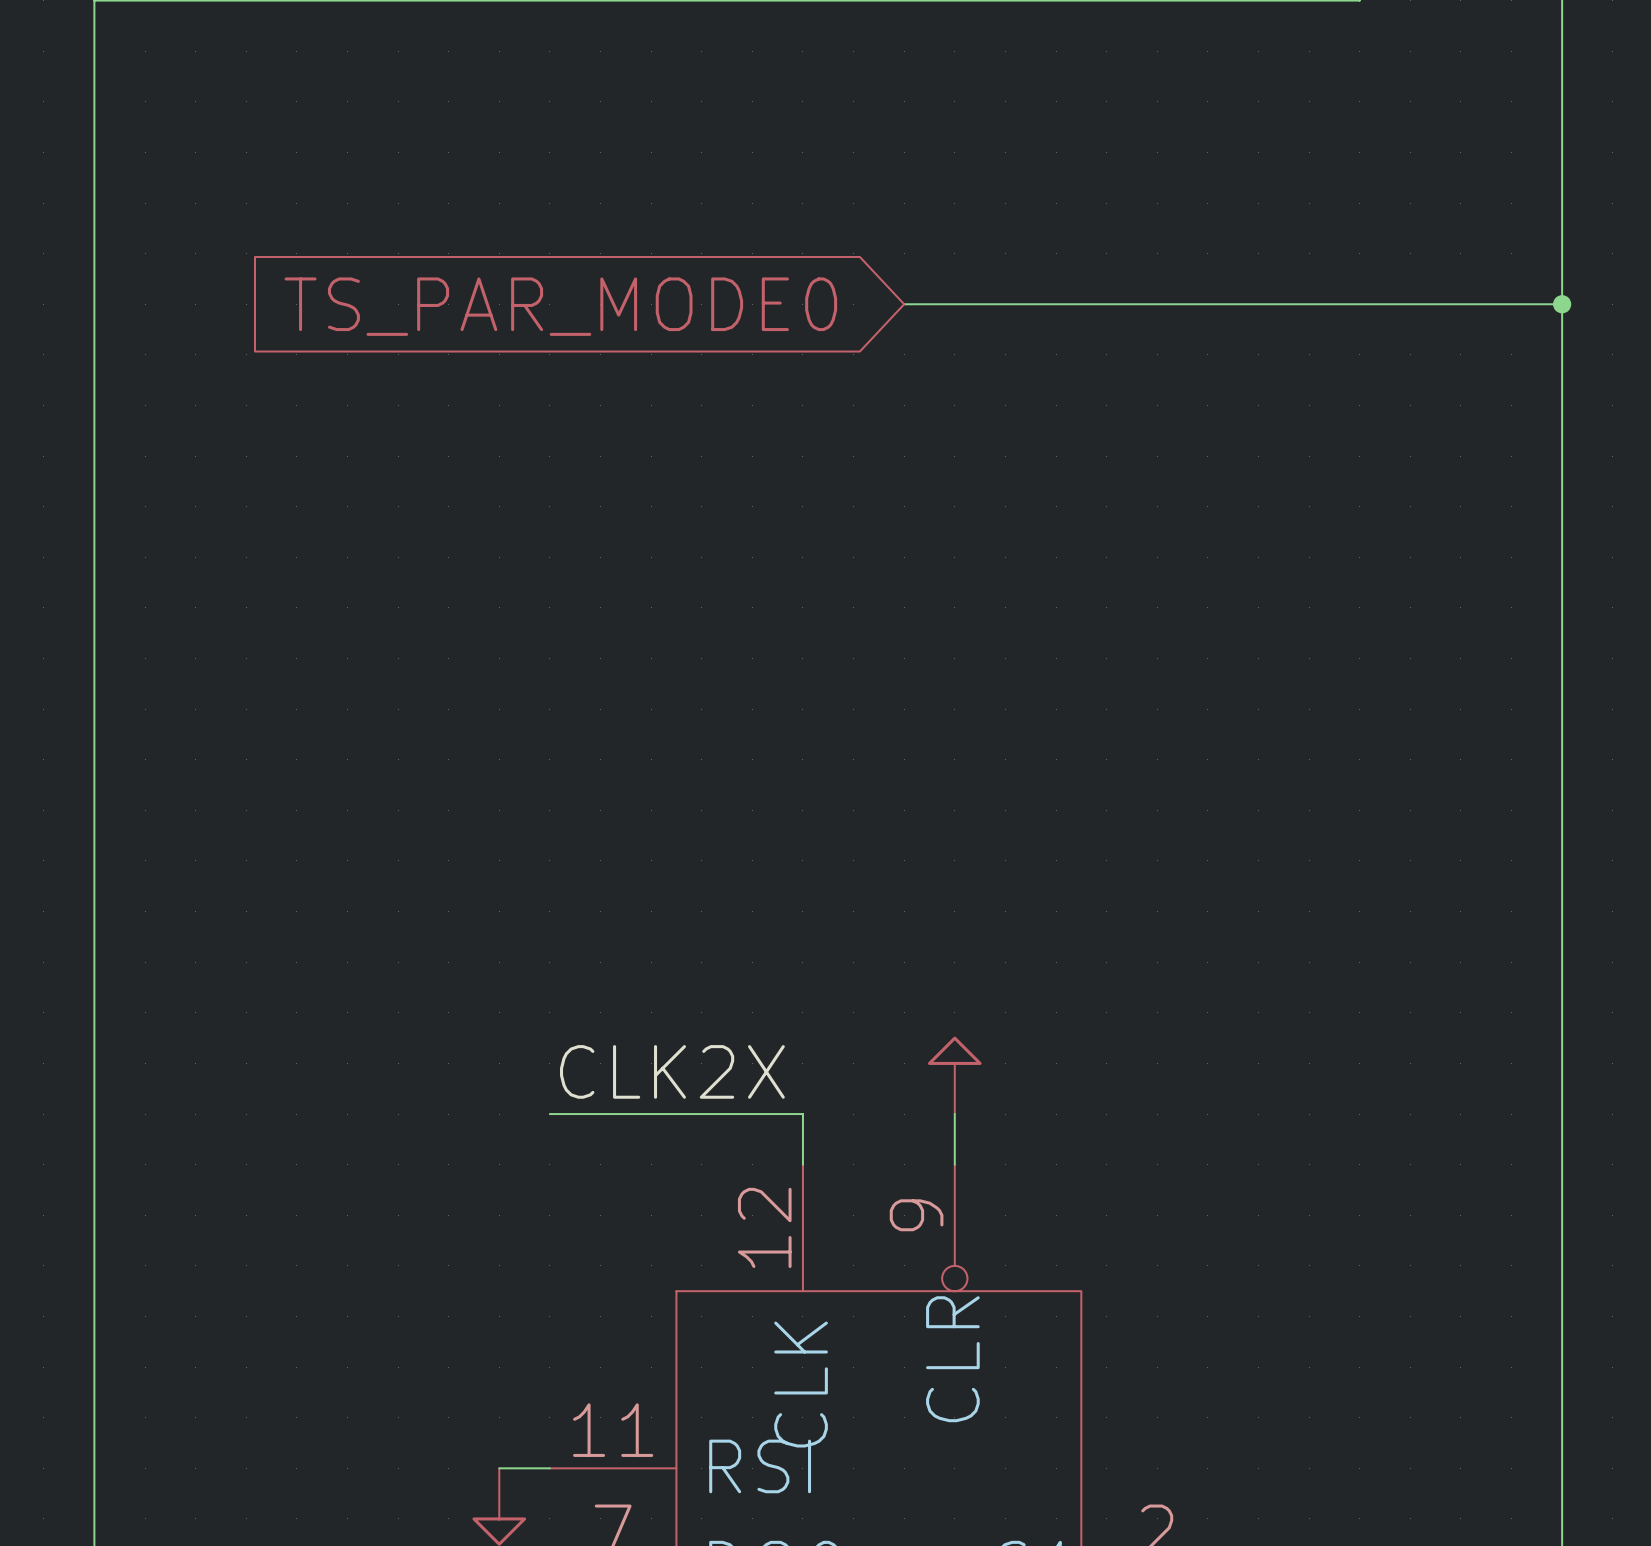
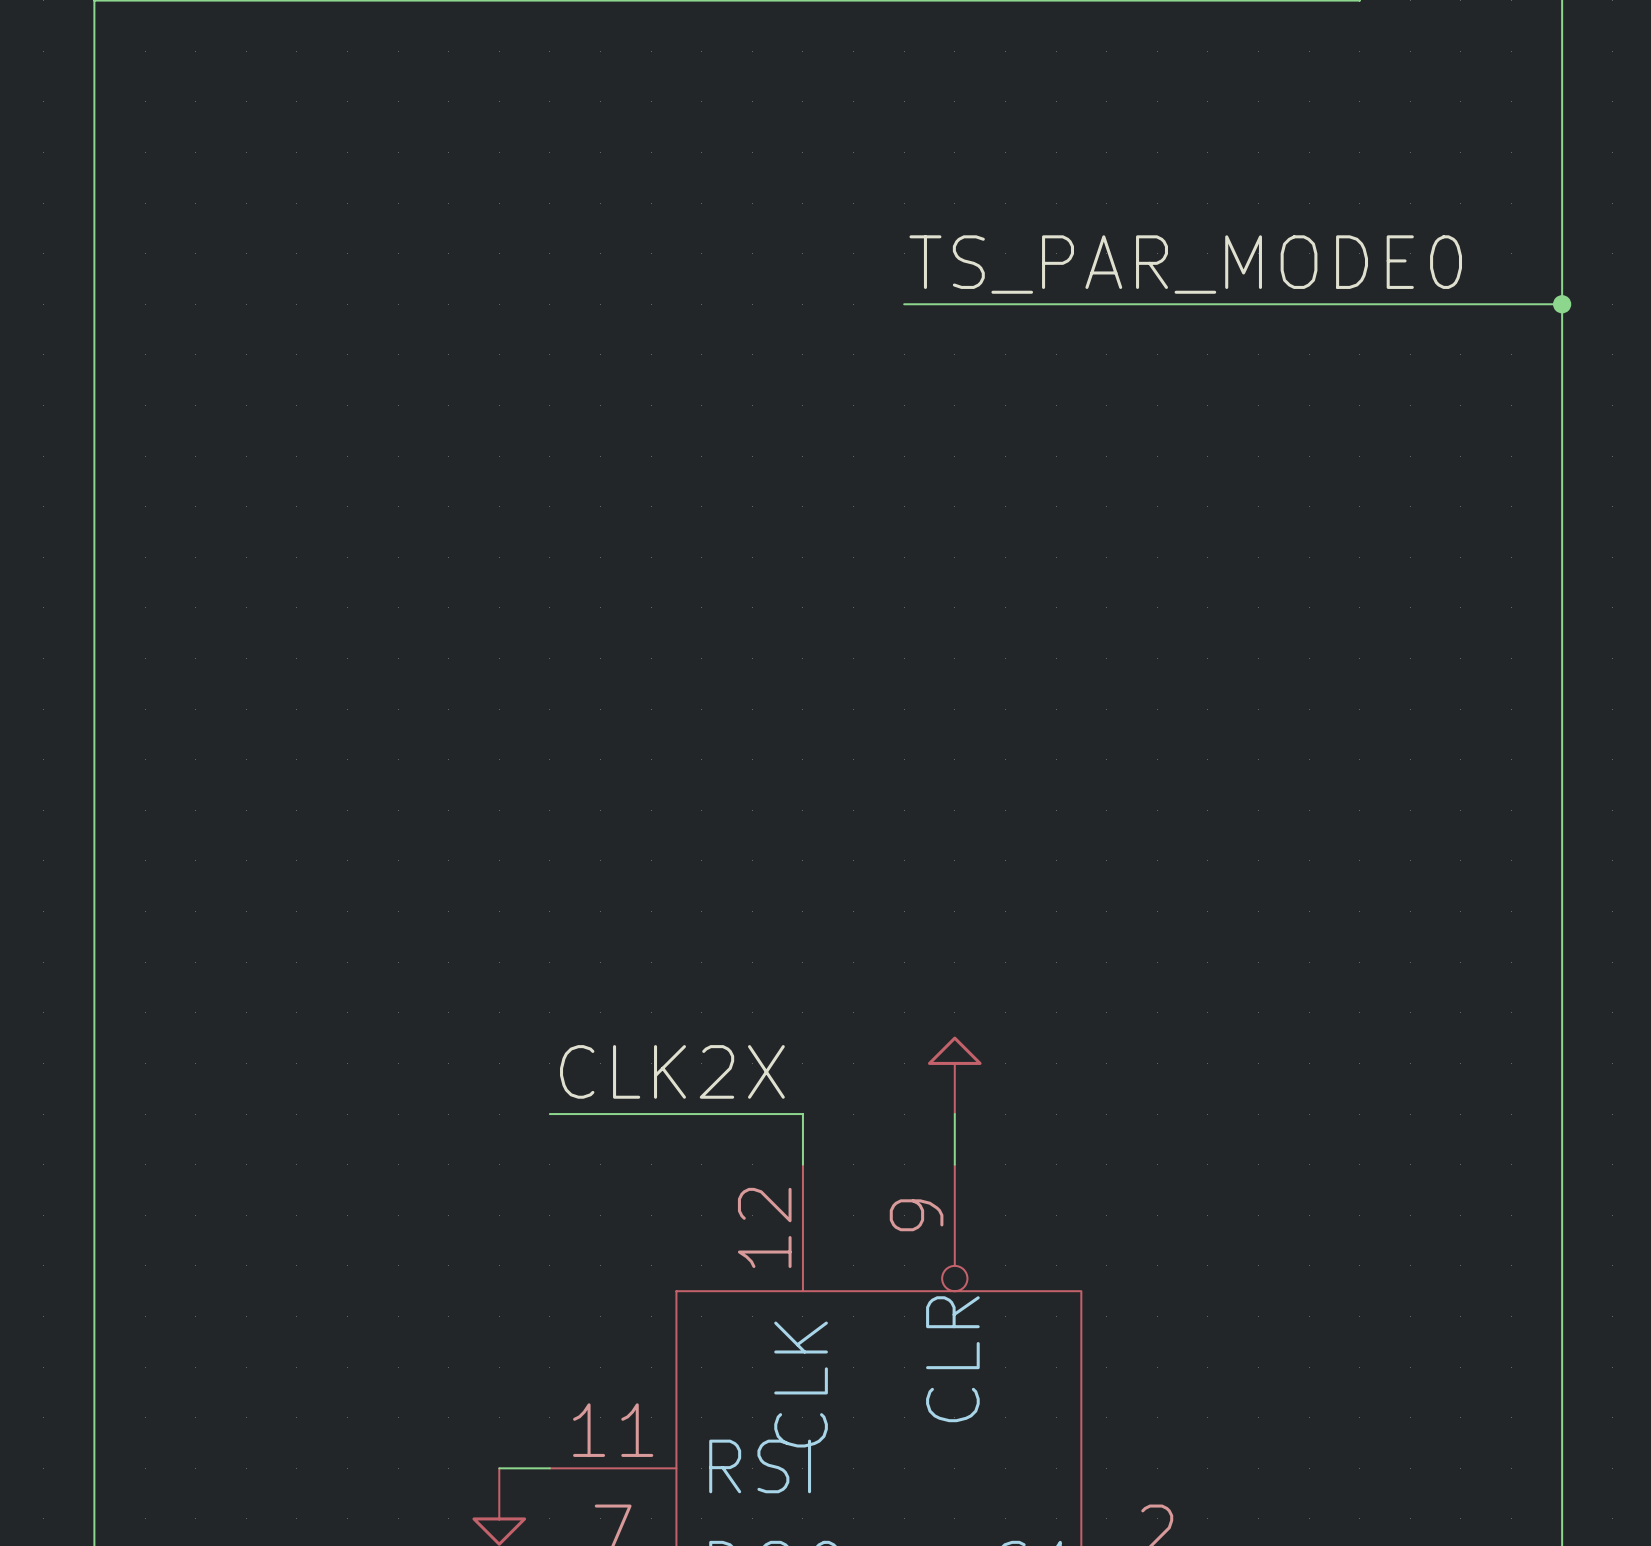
label: none -> TS_PAR_MODE0 (1185, 264)
global label: TS_PAR_MODE0 (560, 306) -> none

